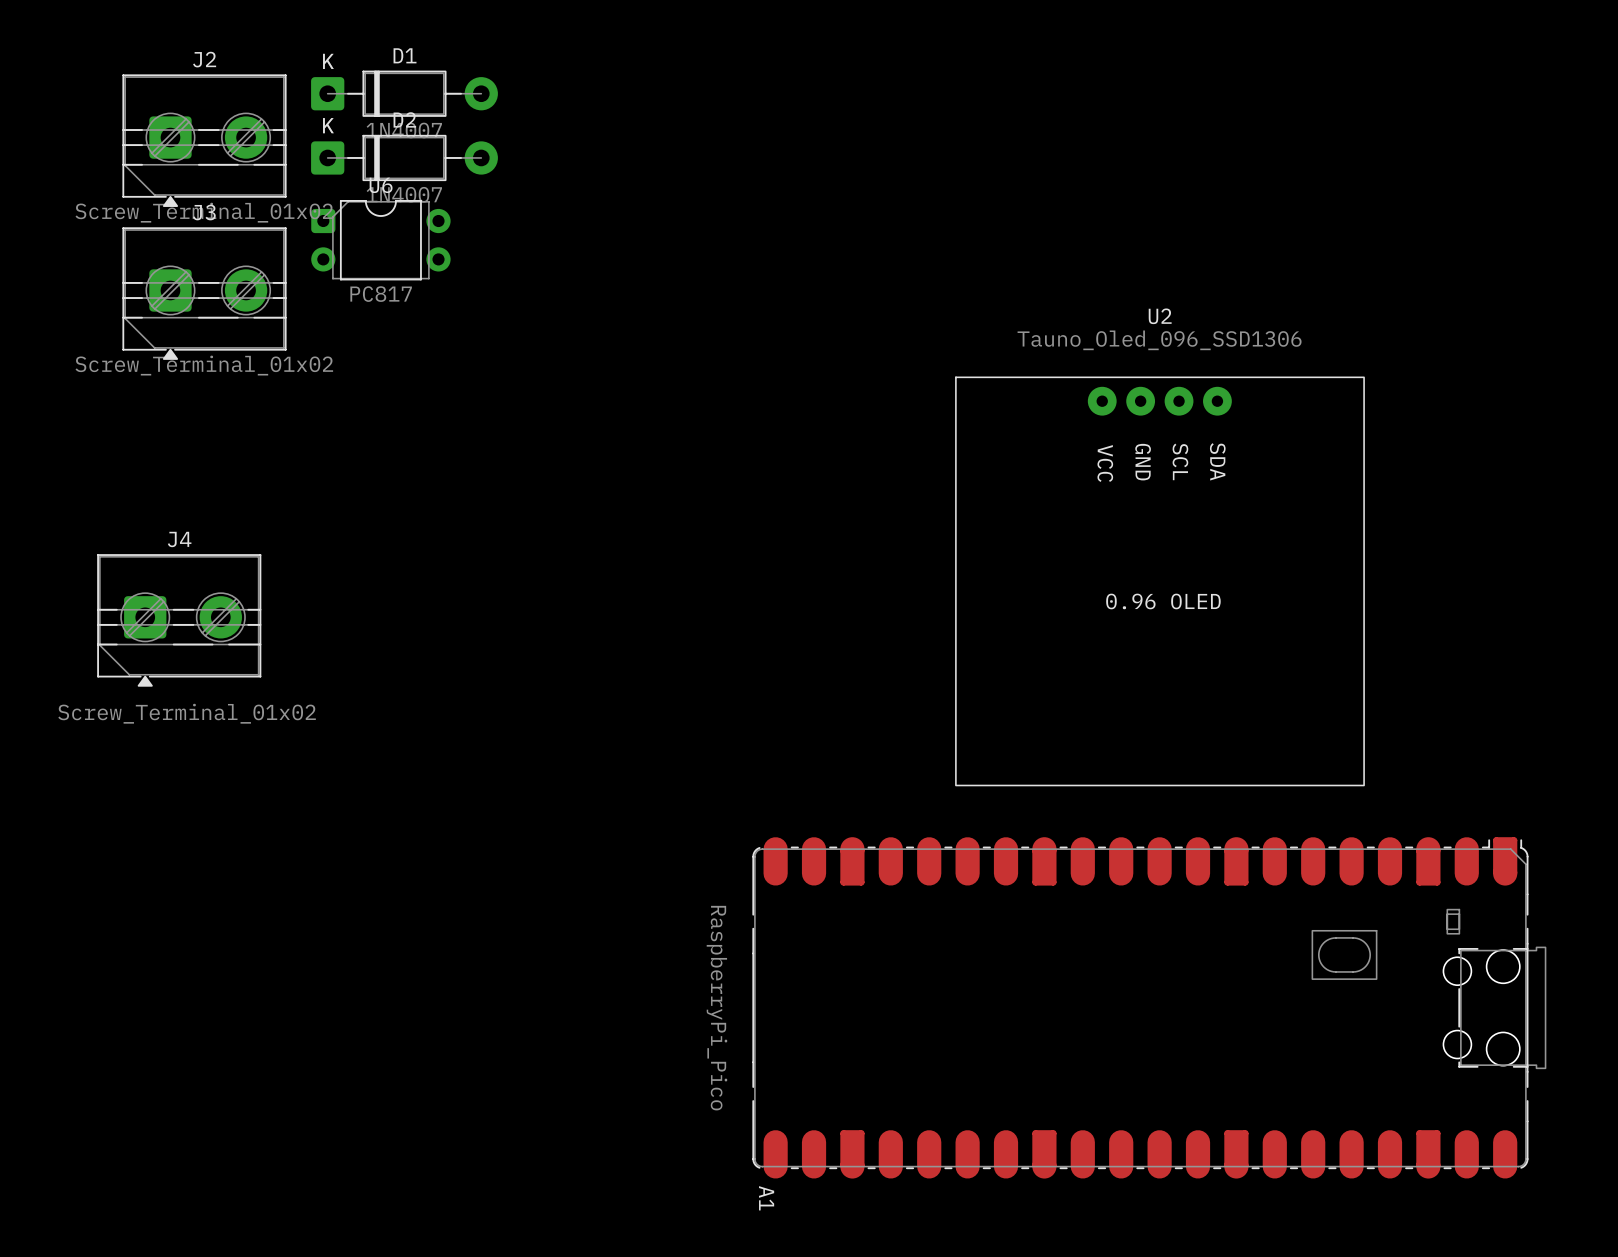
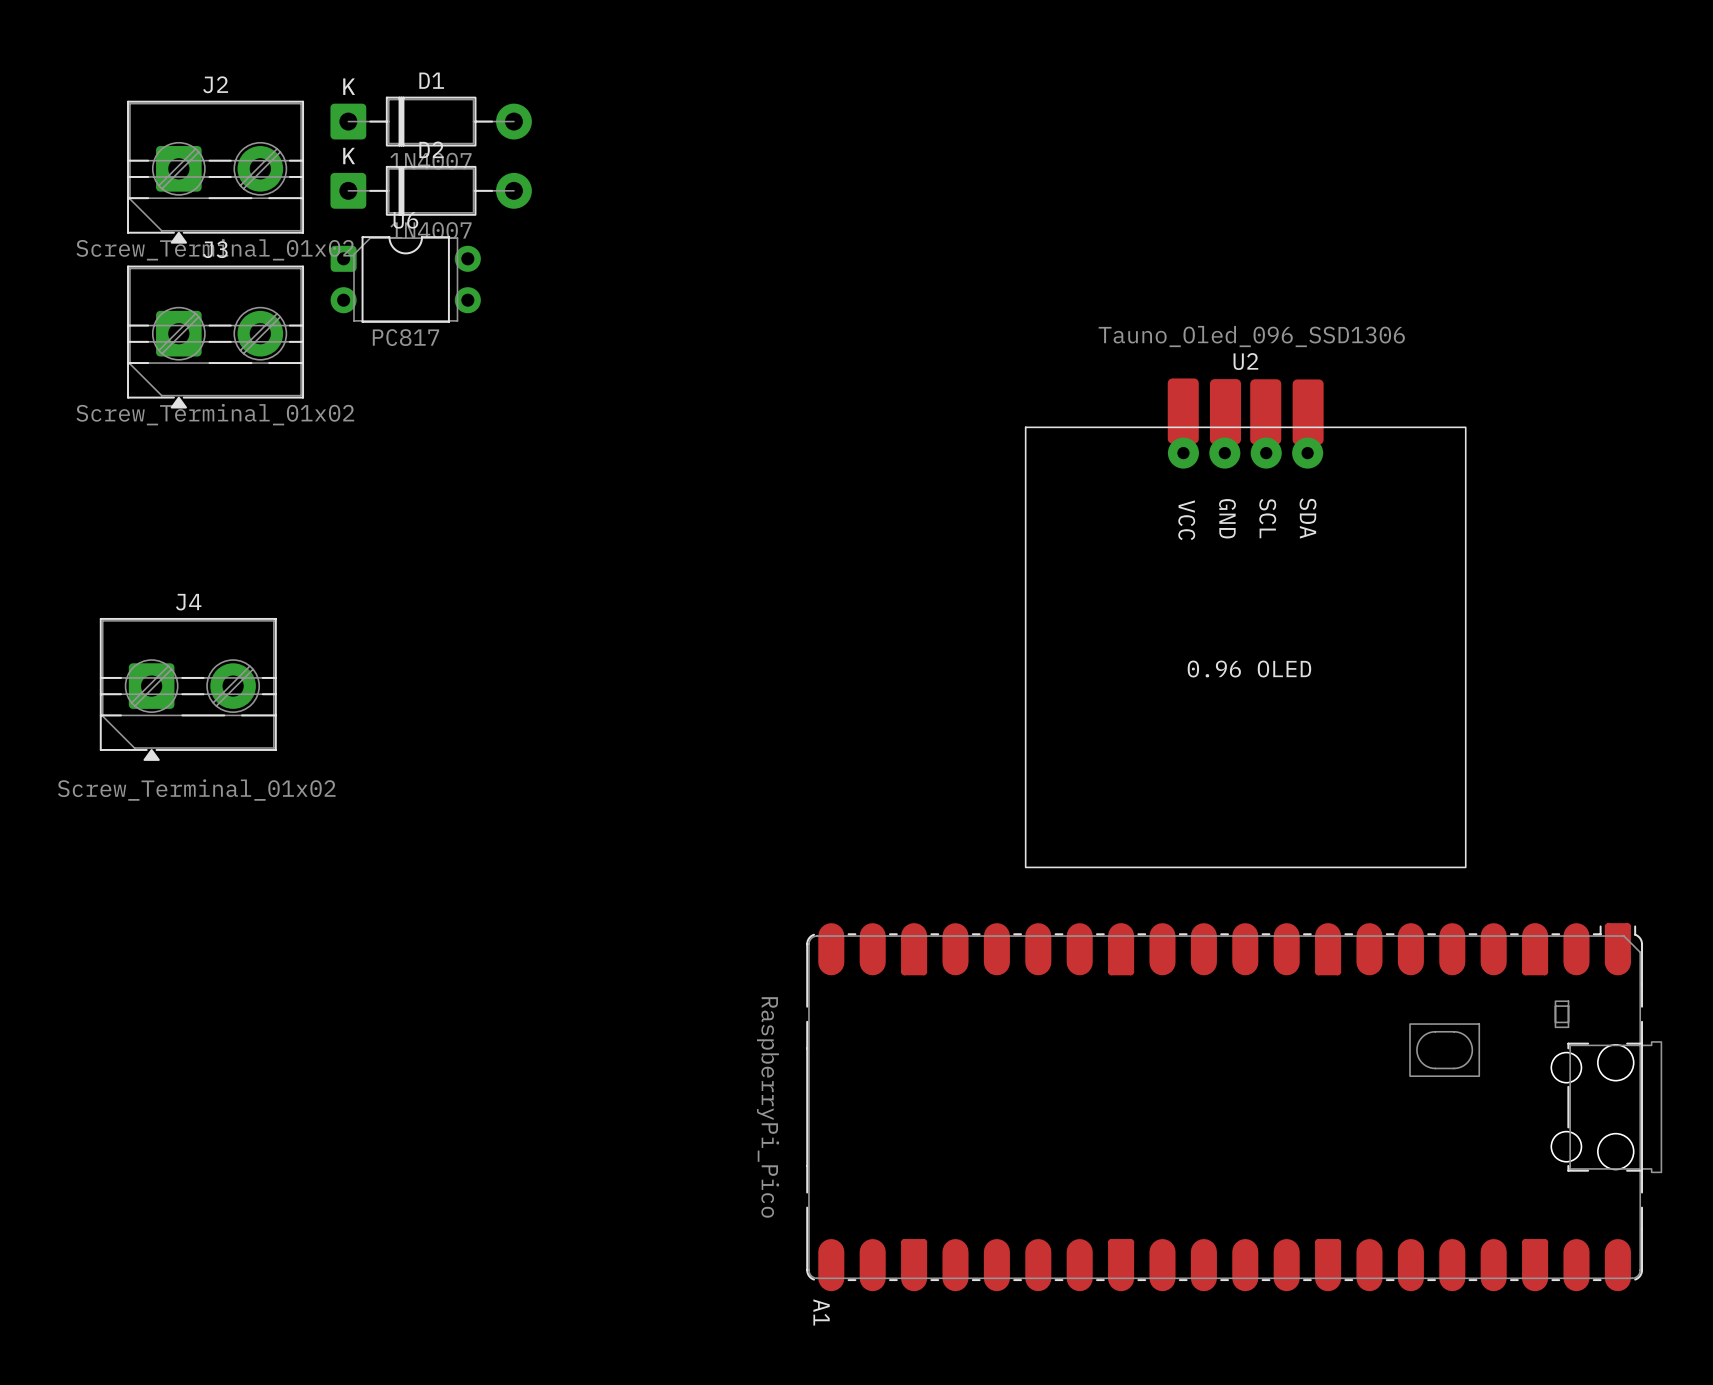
U2 footprint: [955, 376, 1365, 787] -> [1024, 378, 1467, 869]

